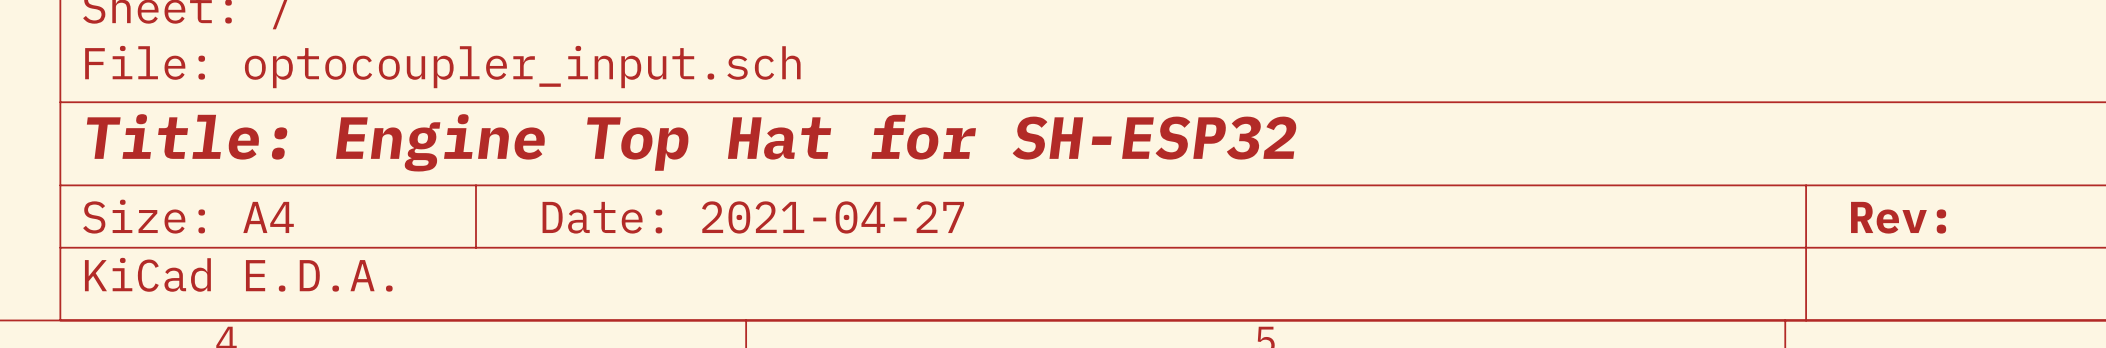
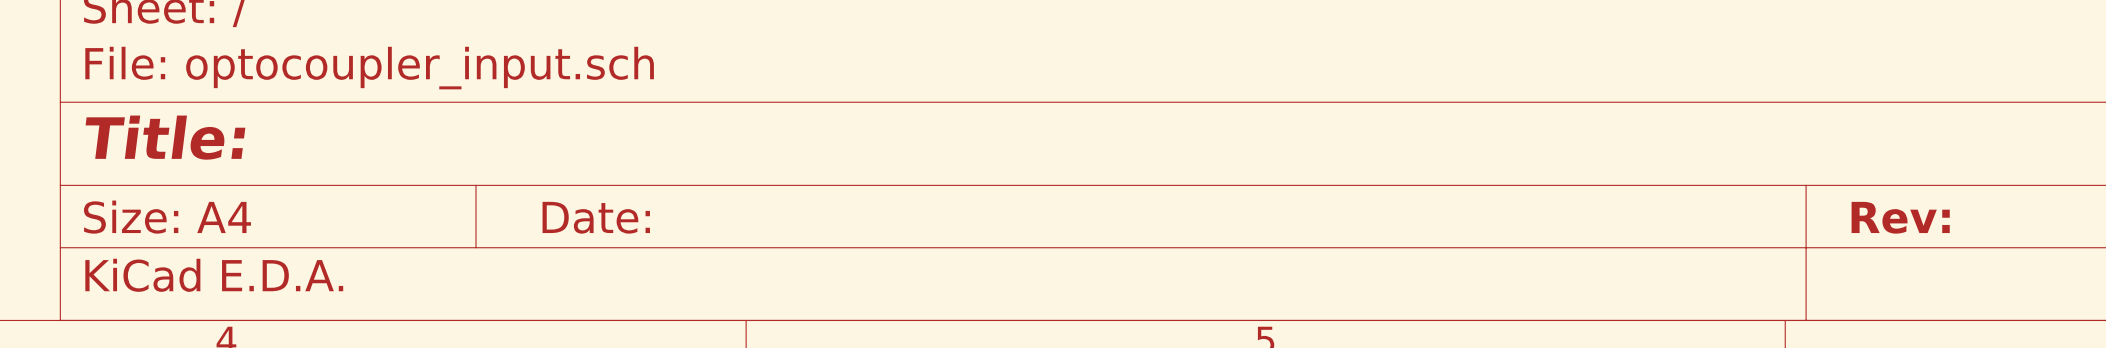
title block: Title: Engine Top Hat for SH-ESP32 (691, 142) -> Title: (165, 137)
title block: Date: 2021-04-27 (753, 217) -> Date: (596, 217)

